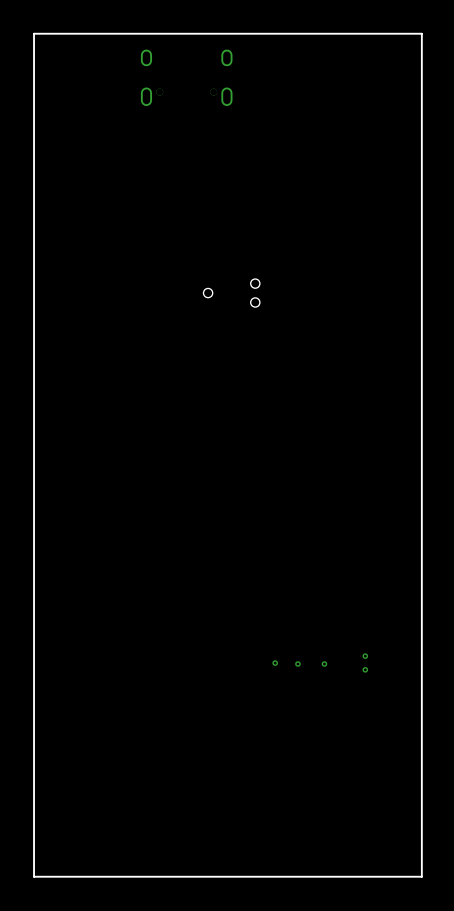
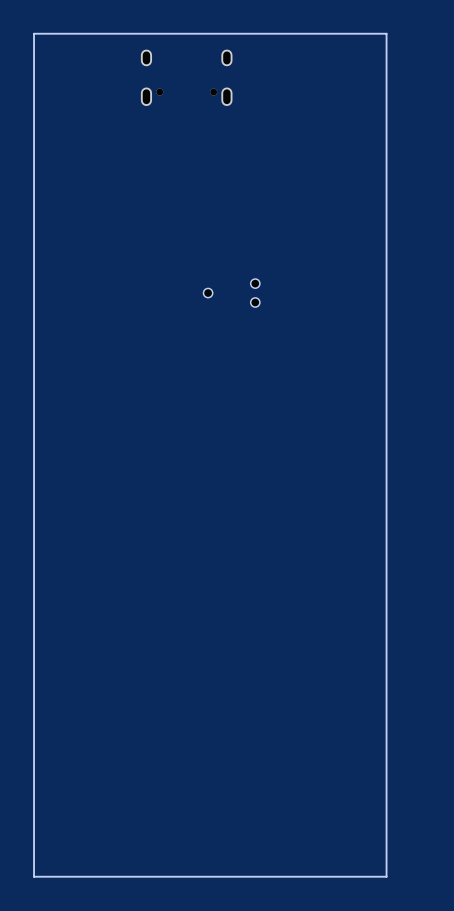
board edge: (386, 33) (421, 33) (421, 876) (386, 876) -> (386, 33) (386, 876)
via: (365, 656) -> none
via: (275, 663) -> none
via: (297, 664) -> none
via: (324, 664) -> none
via: (365, 669) -> none

